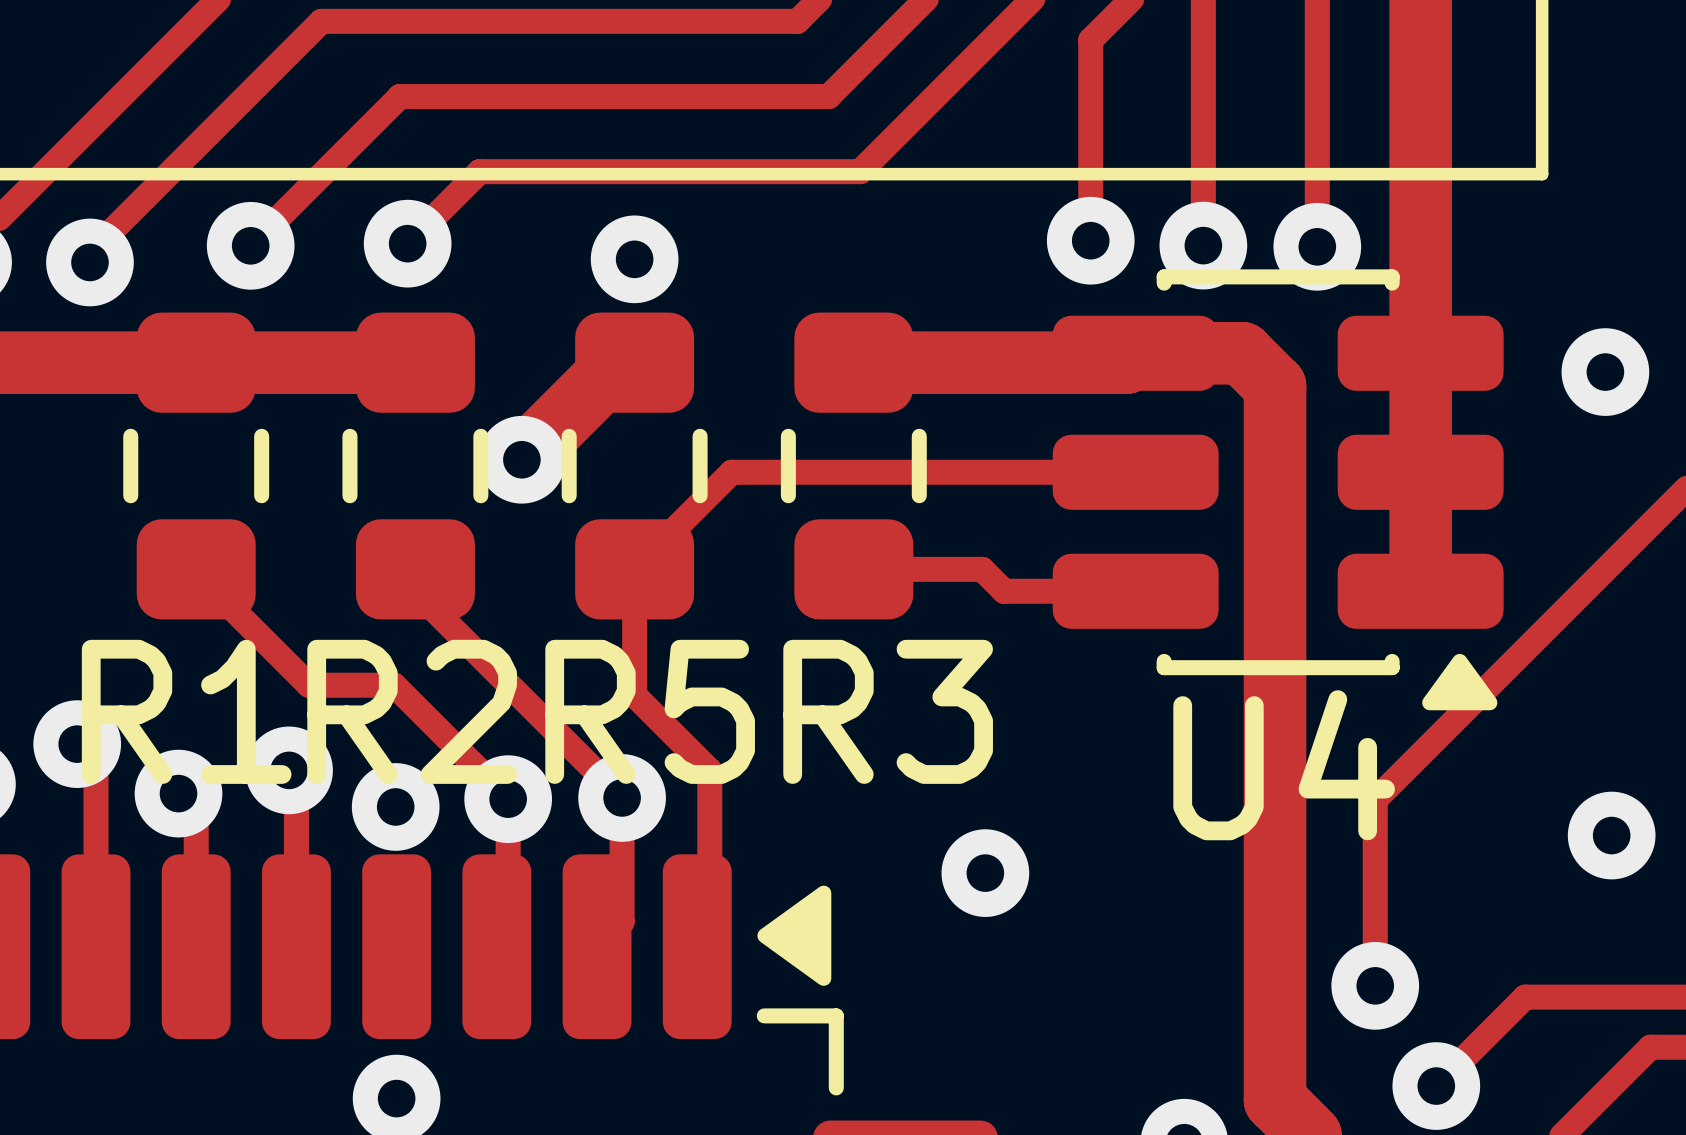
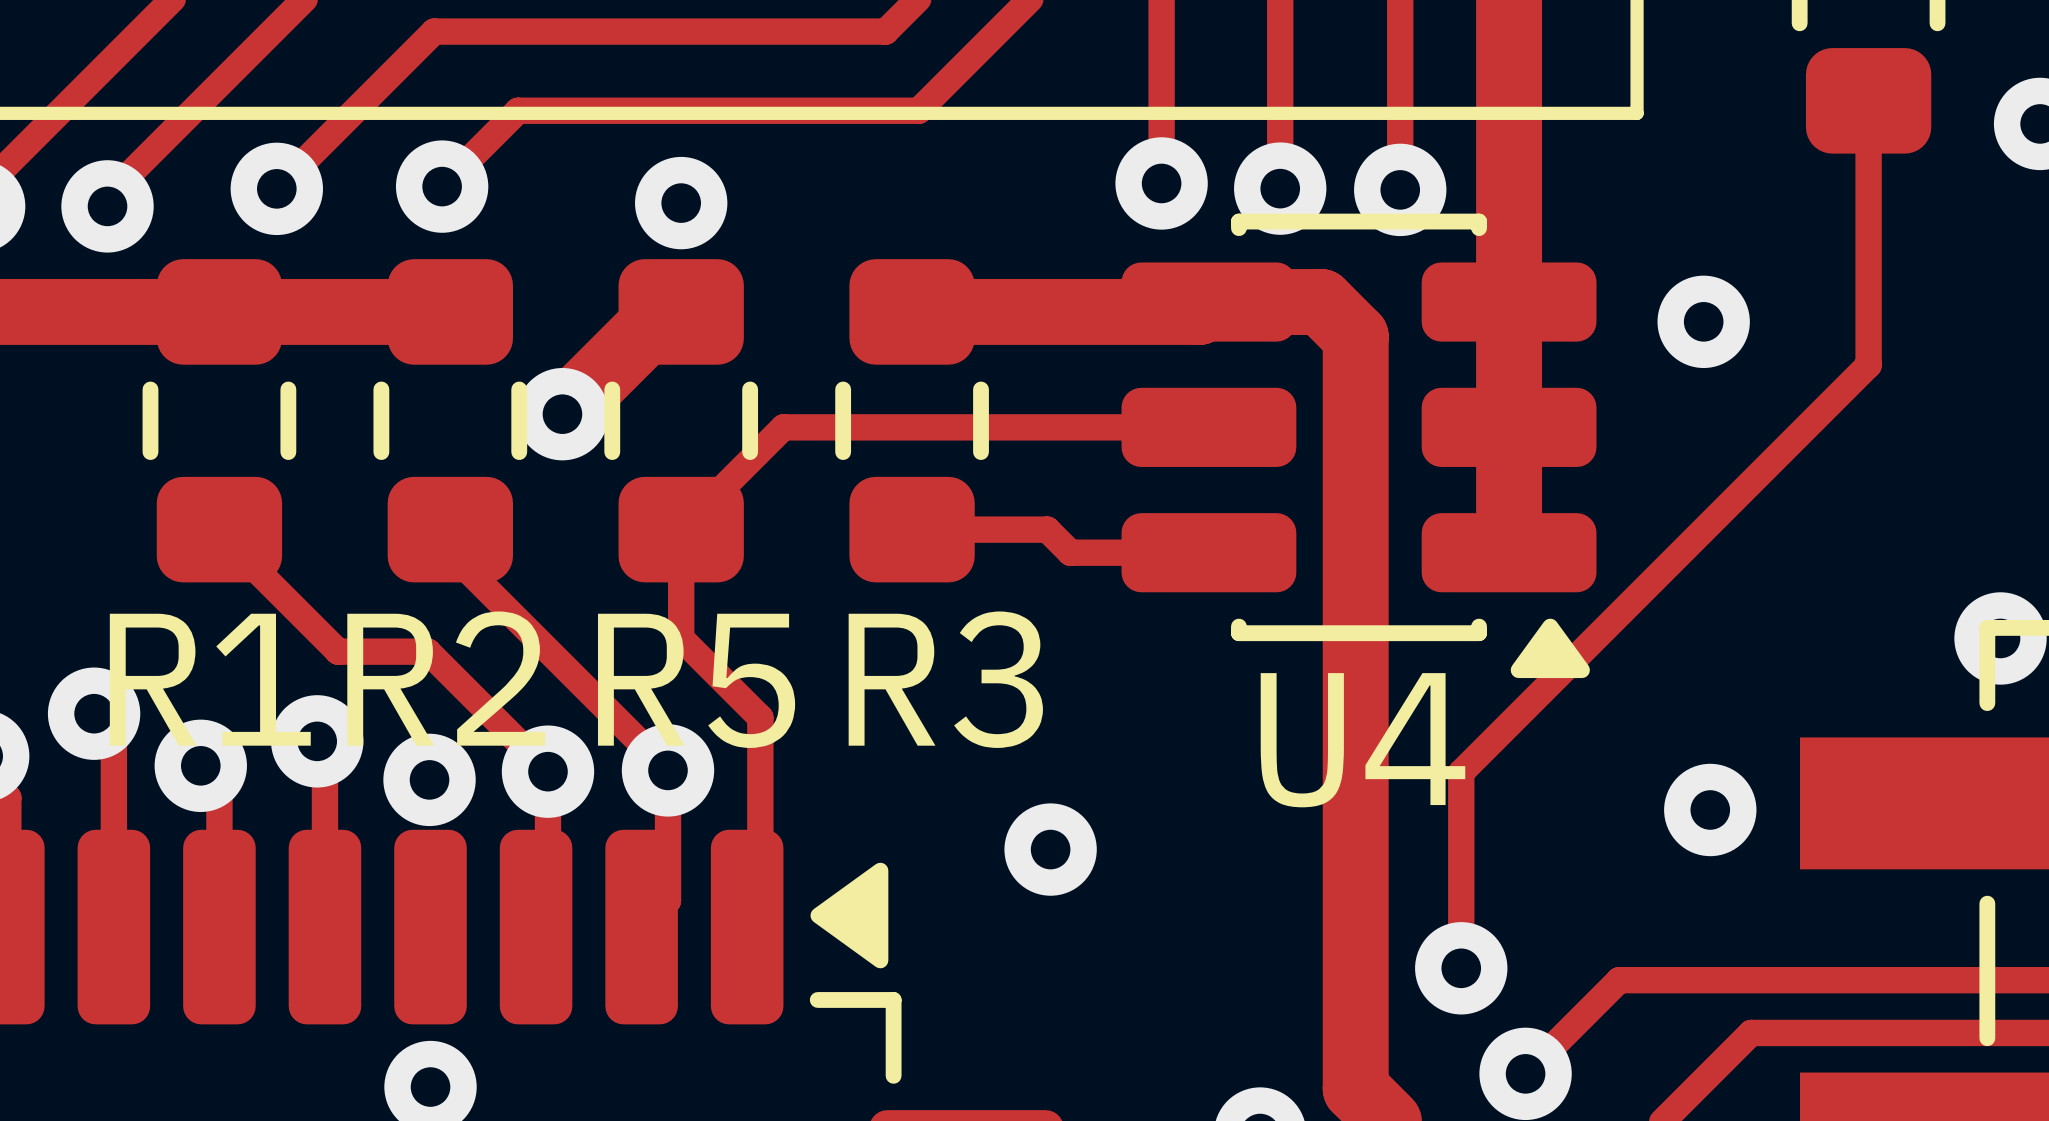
track: (634, 672) (634, 695) (709, 770) -> (681, 638) (760, 717) (760, 741)

